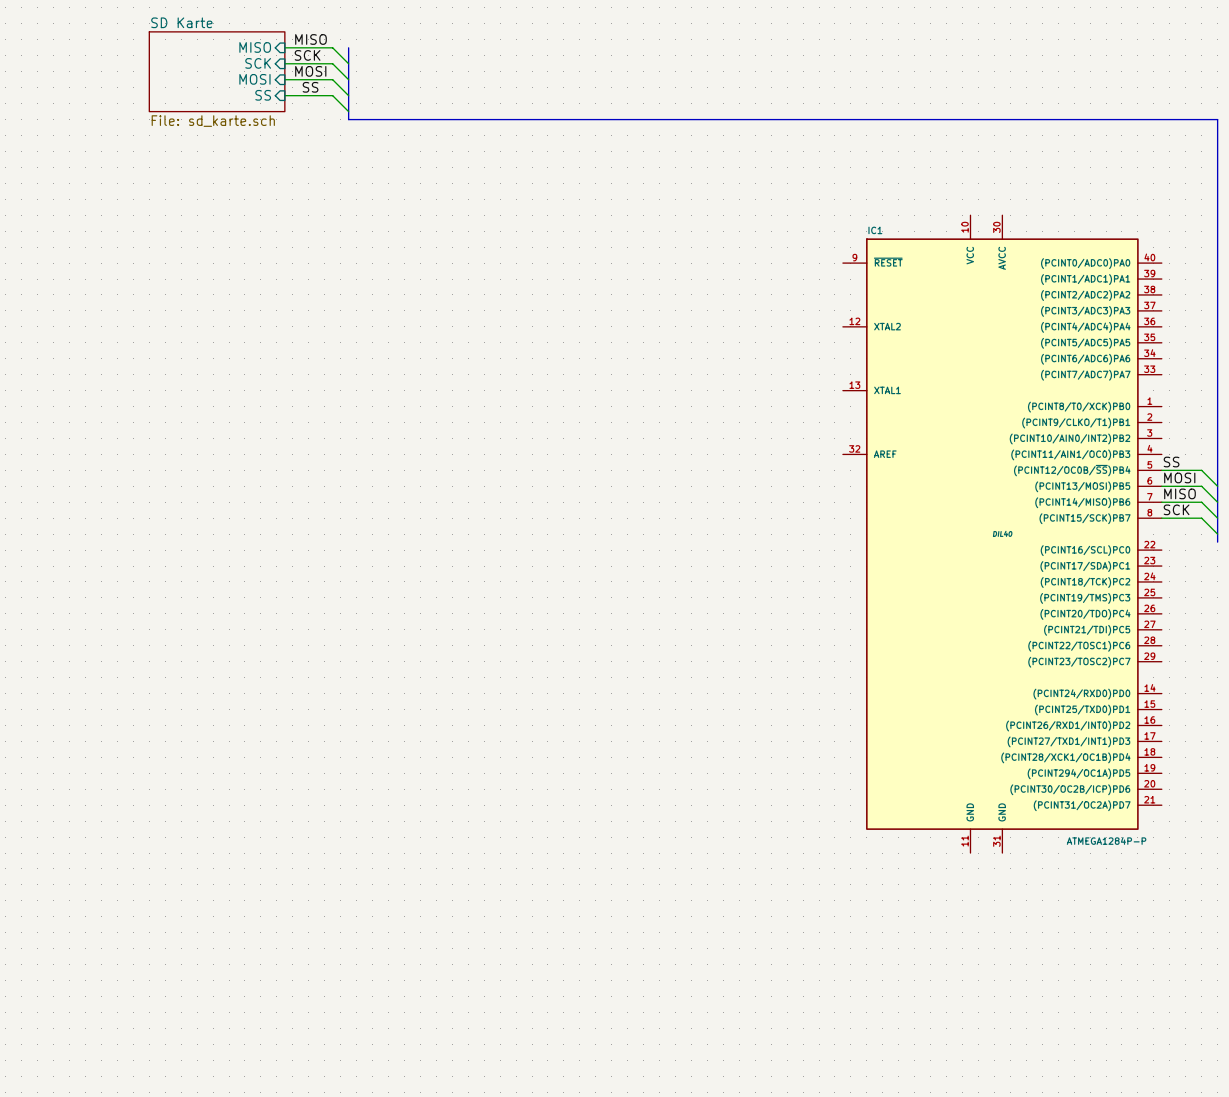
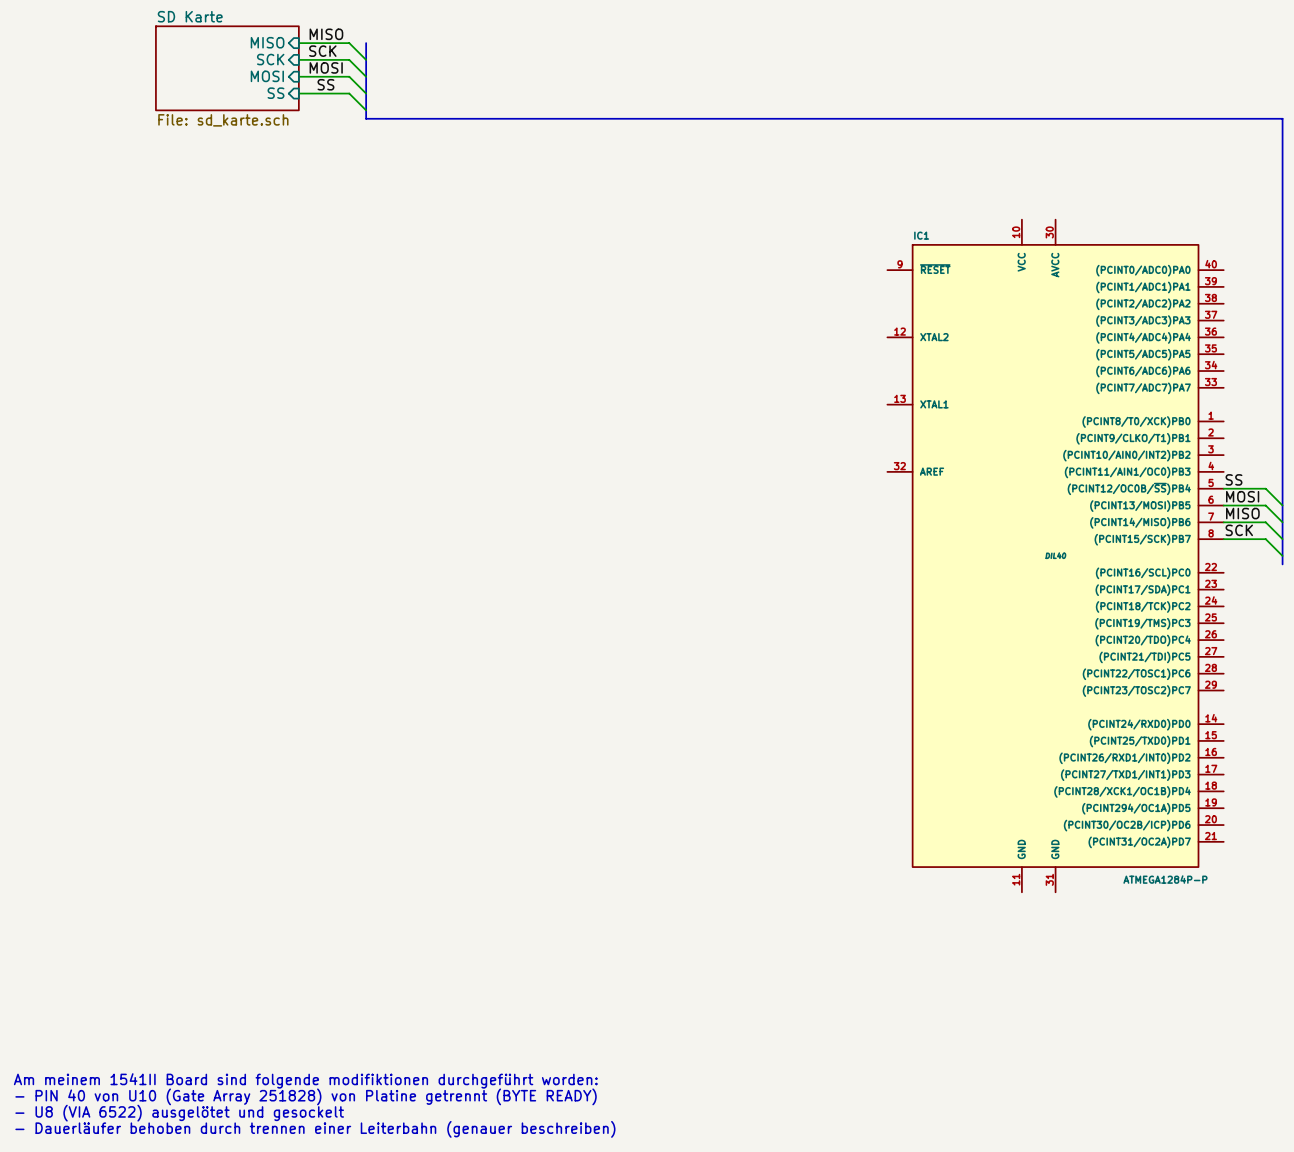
text: none -> Am meinem 1541II Board sind folgende modifiktionen durchgeführt worden: (305, 1080)
text: none -> - PIN 40 von U10 (Gate Array 251828) von Platine getrennt (BYTE READY) (306, 1096)
text: none -> - U8 (VIA 6522) ausgelötet und gesockelt (179, 1113)
text: none -> - Dauerläufer behoben durch trennen einer Leiterbahn (genauer beschreiben) (315, 1129)

